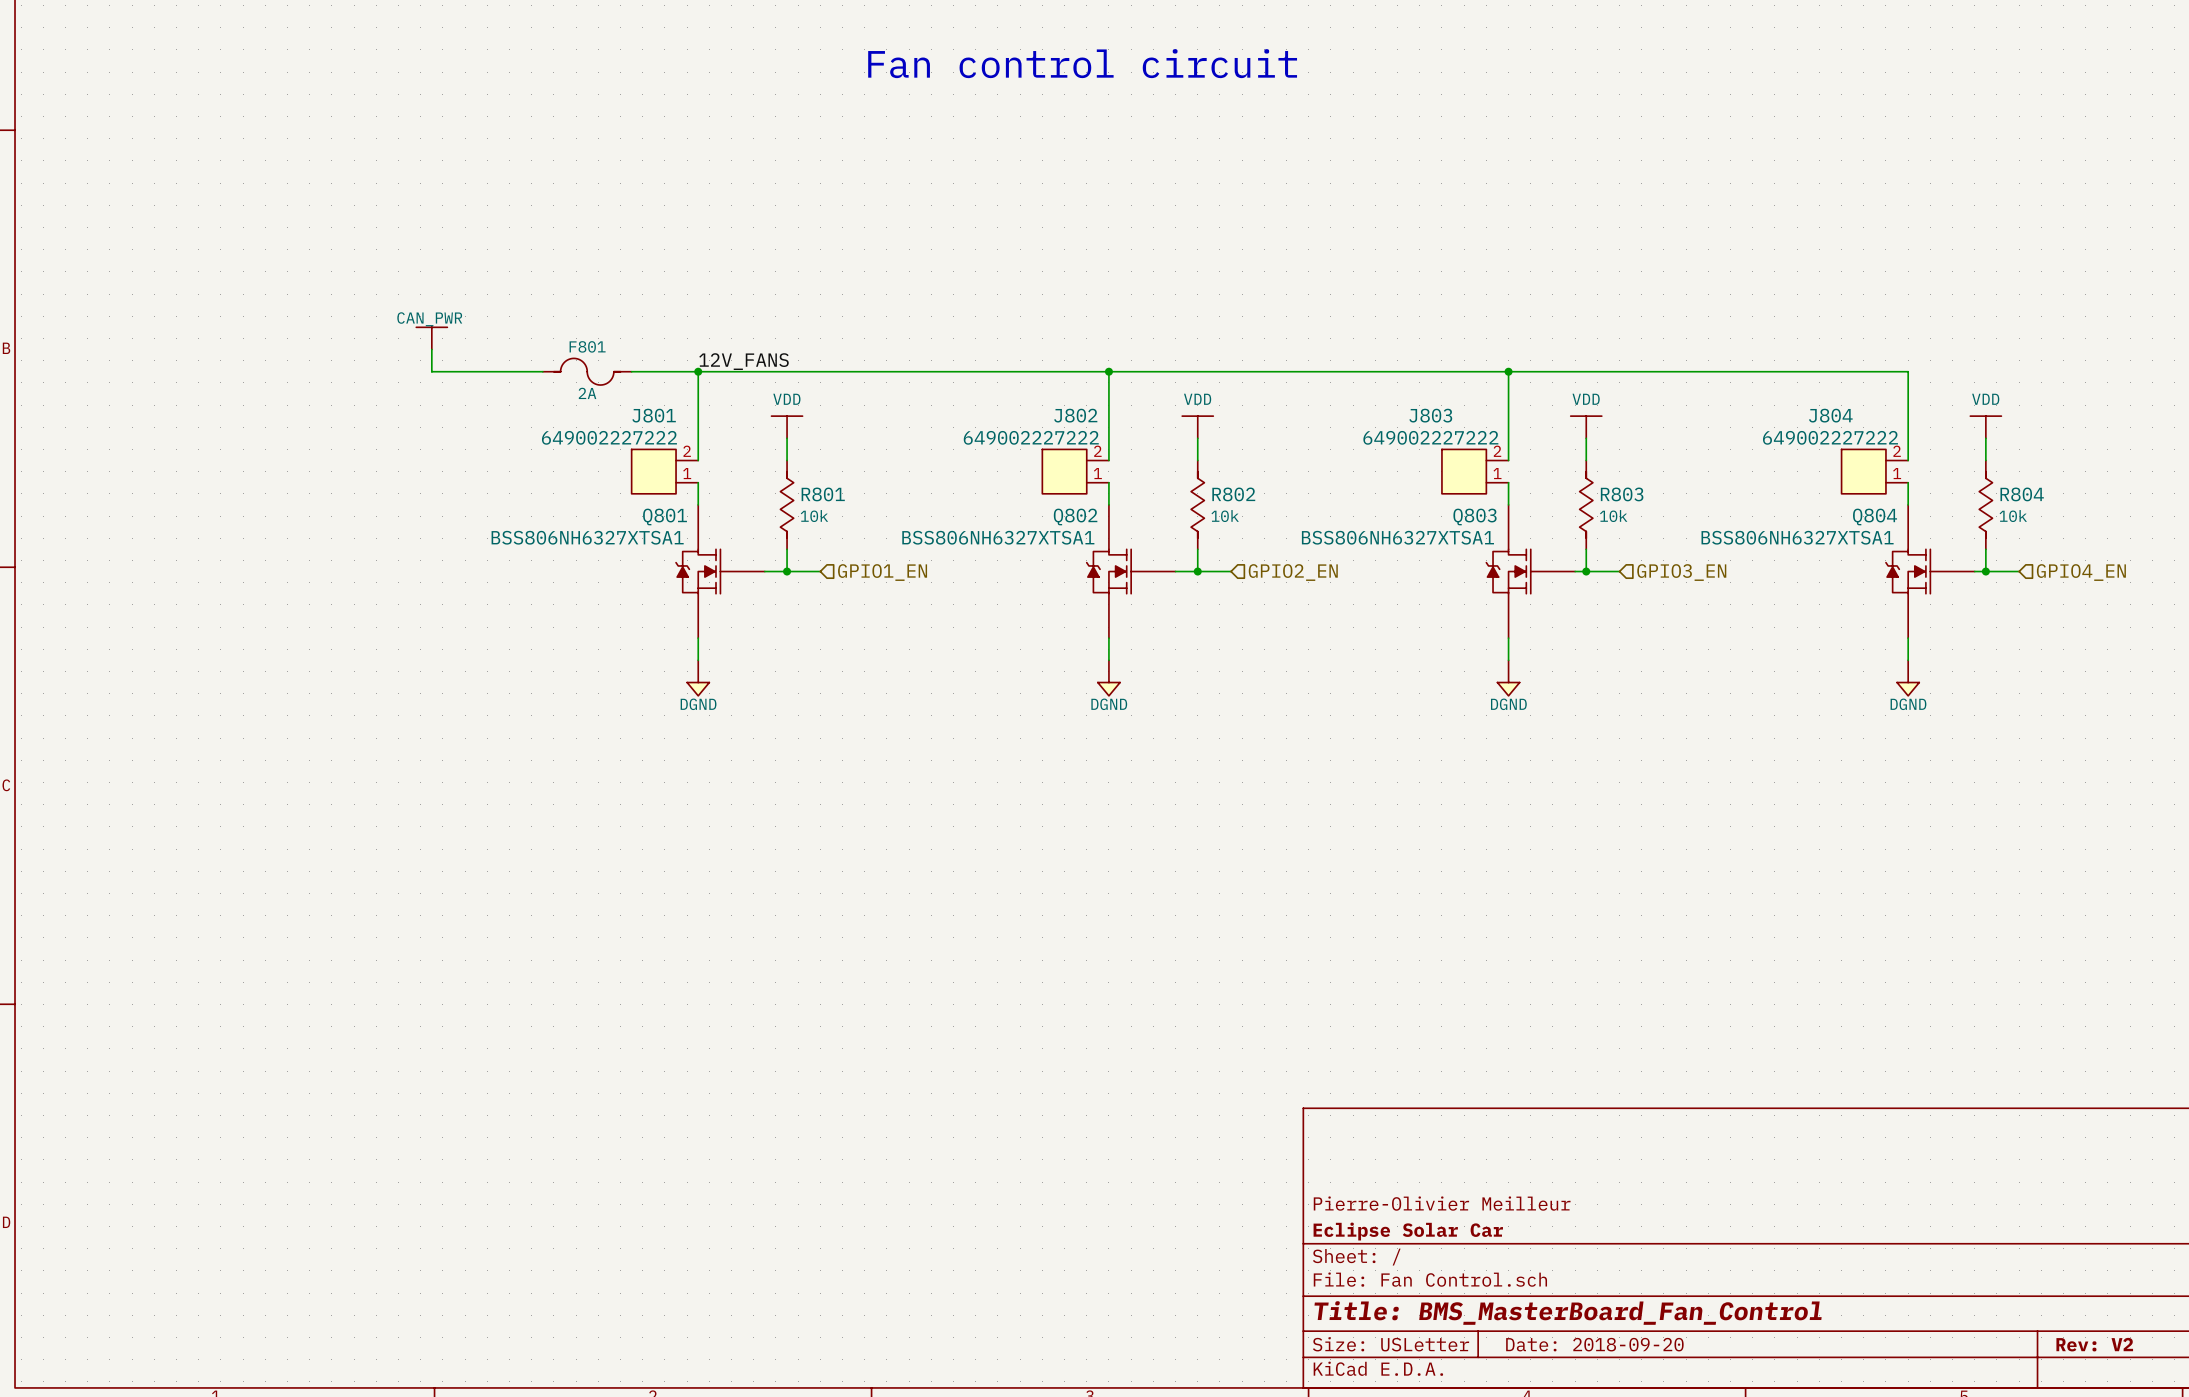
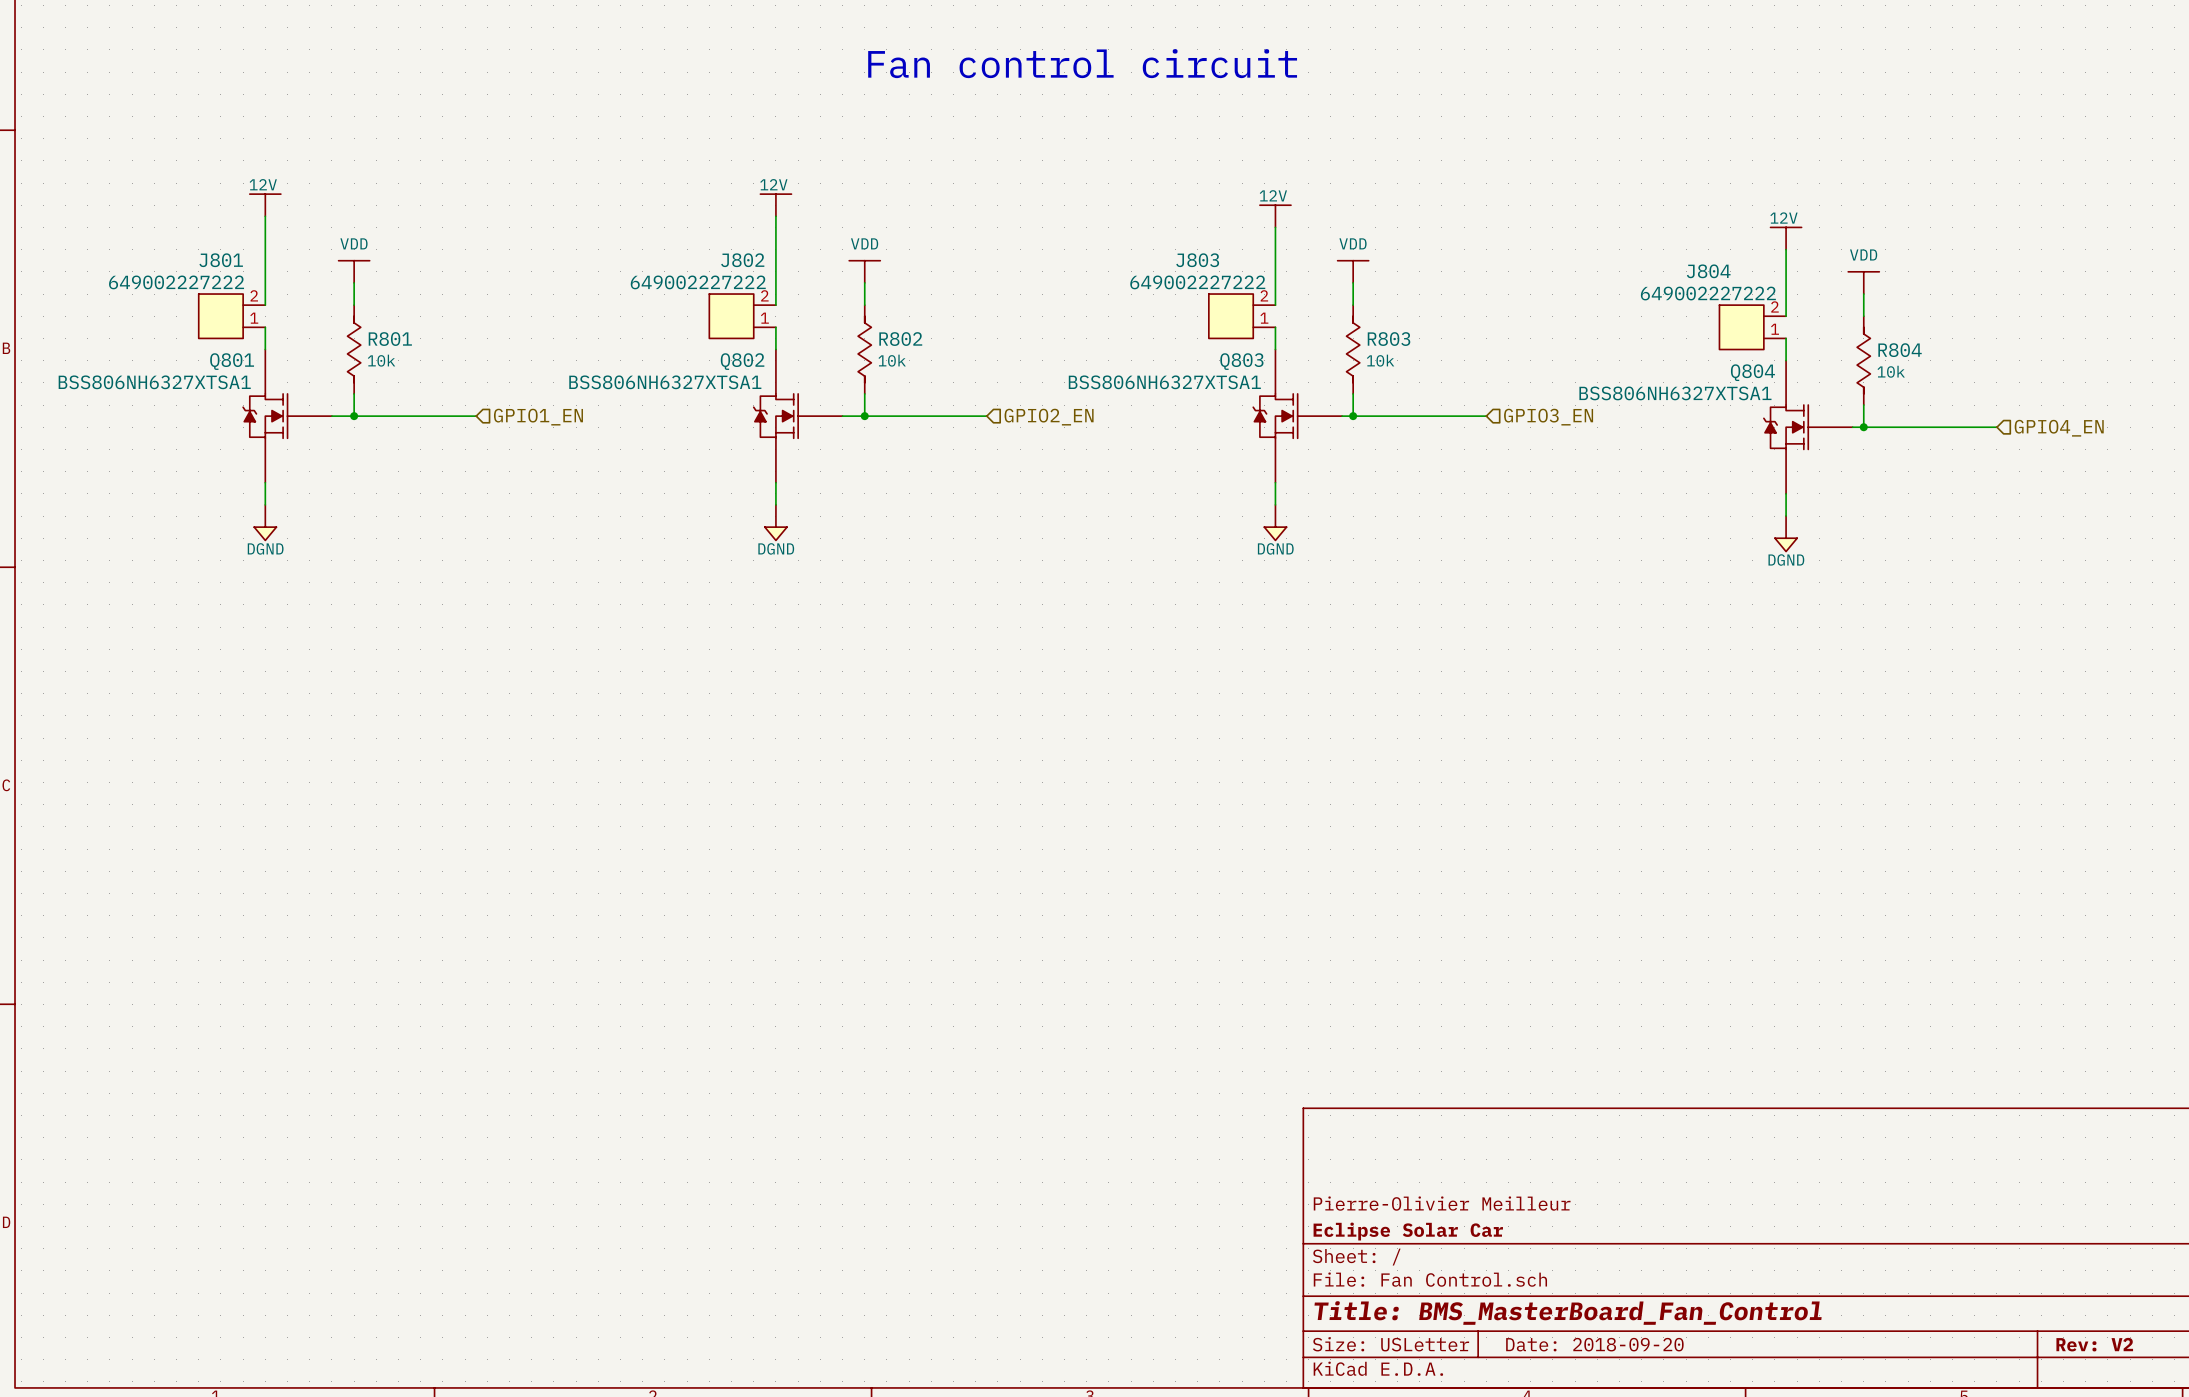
power symbol: none -> 12V (265, 205)
power symbol: none -> 12V (775, 205)
wire: none -> (265, 216) (265, 305)
power symbol: none -> 12V (1275, 216)
wire: none -> (1275, 227) (1275, 305)
power symbol: none -> 12V (1786, 238)
wire: none -> (1786, 249) (1786, 316)
power symbol: none -> VDD (354, 271)
power symbol: none -> VDD (1353, 271)
wire: none -> (354, 282) (354, 305)
wire: none -> (1353, 282) (1353, 305)
power symbol: none -> VDD (1863, 282)
wire: none -> (265, 327) (265, 349)
wire: none -> (1275, 327) (1275, 349)
power symbol: CAN_PWR (431, 338) -> none
wire: (431, 349) (431, 371) (542, 371) -> none
label: 12V_FANS (743, 361) -> none
F801: (587, 371) -> none
wire: (631, 371) (1908, 371) (1908, 460) -> none
wire: (698, 371) (698, 460) -> (775, 216) (775, 305)
junction: (698, 371) -> none
wire: (1108, 371) (1108, 460) -> none
junction: (1108, 371) -> none
wire: (1508, 371) (1508, 460) -> none
junction: (1508, 371) -> none
wire: none -> (354, 393) (354, 416)
wire: none -> (331, 416) (476, 416)
junction: none -> (354, 416)
wire: none -> (842, 416) (986, 416)
junction: none -> (864, 416)
wire: none -> (1342, 416) (1486, 416)
junction: none -> (1353, 416)
hierarchical label: none -> GPIO1_EN (538, 417)
hierarchical label: none -> GPIO2_EN (1049, 417)
power symbol position: VDD (787, 427) -> VDD (864, 271)
power symbol: VDD (1197, 427) -> none
power symbol: VDD (1586, 427) -> none
wire: none -> (1852, 427) (1996, 427)
junction: none -> (1863, 427)
power symbol: VDD (1985, 427) -> none
wire: (787, 438) (787, 460) -> (864, 282) (864, 305)
wire: (1197, 438) (1197, 460) -> (1275, 482) (1275, 504)
wire: (1586, 438) (1586, 460) -> none
wire: (1985, 438) (1985, 460) -> (1863, 294) (1863, 316)
J801 position: (664, 471) -> (232, 316)
J802 position: (1075, 471) -> (742, 316)
J803 position: (1475, 471) -> (1242, 316)
J804 position: (1874, 471) -> (1752, 327)
wire: none -> (265, 482) (265, 504)
wire: (698, 482) (698, 504) -> (775, 327) (775, 349)
wire: (1108, 482) (1108, 504) -> none
wire: (1508, 482) (1508, 504) -> (1353, 393) (1353, 416)
wire: (1908, 482) (1908, 504) -> (1786, 338) (1786, 360)
R801 position: (787, 504) -> (354, 349)
R802 position: (1197, 504) -> (864, 349)
R803 position: (1586, 504) -> (1353, 349)
R804 position: (1985, 504) -> (1863, 360)
power symbol: none -> DGND (265, 522)
power symbol: none -> DGND (1275, 522)
power symbol: none -> DGND (1786, 533)
wire: (787, 549) (787, 571) -> (864, 393) (864, 416)
wire: (1197, 549) (1197, 571) -> none
wire: (1586, 549) (1586, 571) -> none
wire: (1985, 549) (1985, 571) -> (1863, 405) (1863, 427)
Q801 position: (720, 571) -> (287, 416)
wire: (764, 571) (820, 571) -> none
junction: (787, 571) -> none
Q802 position: (1131, 571) -> (798, 416)
wire: (1175, 571) (1231, 571) -> none
junction: (1197, 571) -> none
Q803 position: (1530, 571) -> (1297, 416)
wire: (1575, 571) (1619, 571) -> none
junction: (1586, 571) -> none
Q804 position: (1930, 571) -> (1808, 427)
wire: (1974, 571) (2019, 571) -> none
junction: (1985, 571) -> none
hierarchical label: GPIO1_EN (882, 572) -> none
hierarchical label: GPIO2_EN (1293, 572) -> none
hierarchical label position: GPIO3_EN (1681, 572) -> GPIO3_EN (1548, 417)
hierarchical label position: GPIO4_EN (2081, 572) -> GPIO4_EN (2059, 428)
wire: (698, 638) (698, 660) -> (775, 482) (775, 504)
wire: (1108, 638) (1108, 660) -> none
wire: (1508, 638) (1508, 660) -> none
wire: (1908, 638) (1908, 660) -> (1786, 493) (1786, 516)
power symbol position: DGND (698, 678) -> DGND (775, 522)
power symbol: DGND (1108, 678) -> none
power symbol: DGND (1508, 678) -> none
power symbol: DGND (1908, 678) -> none

